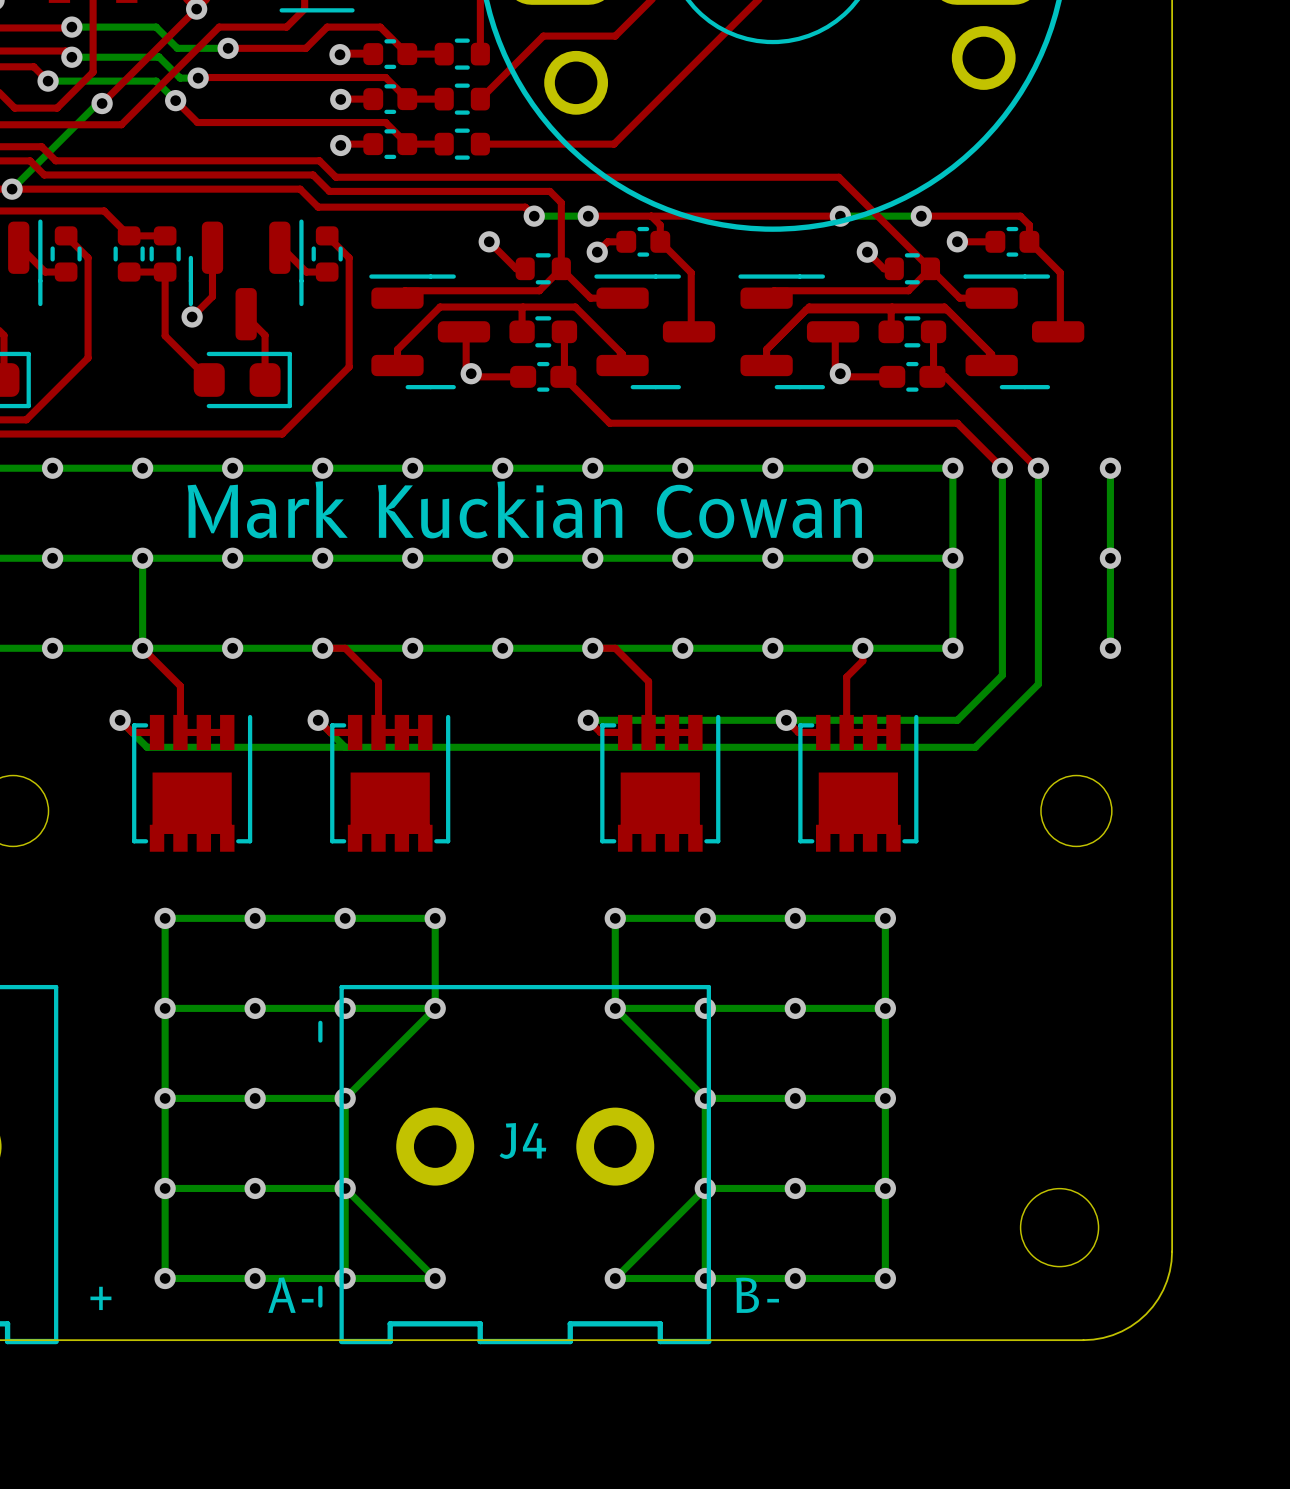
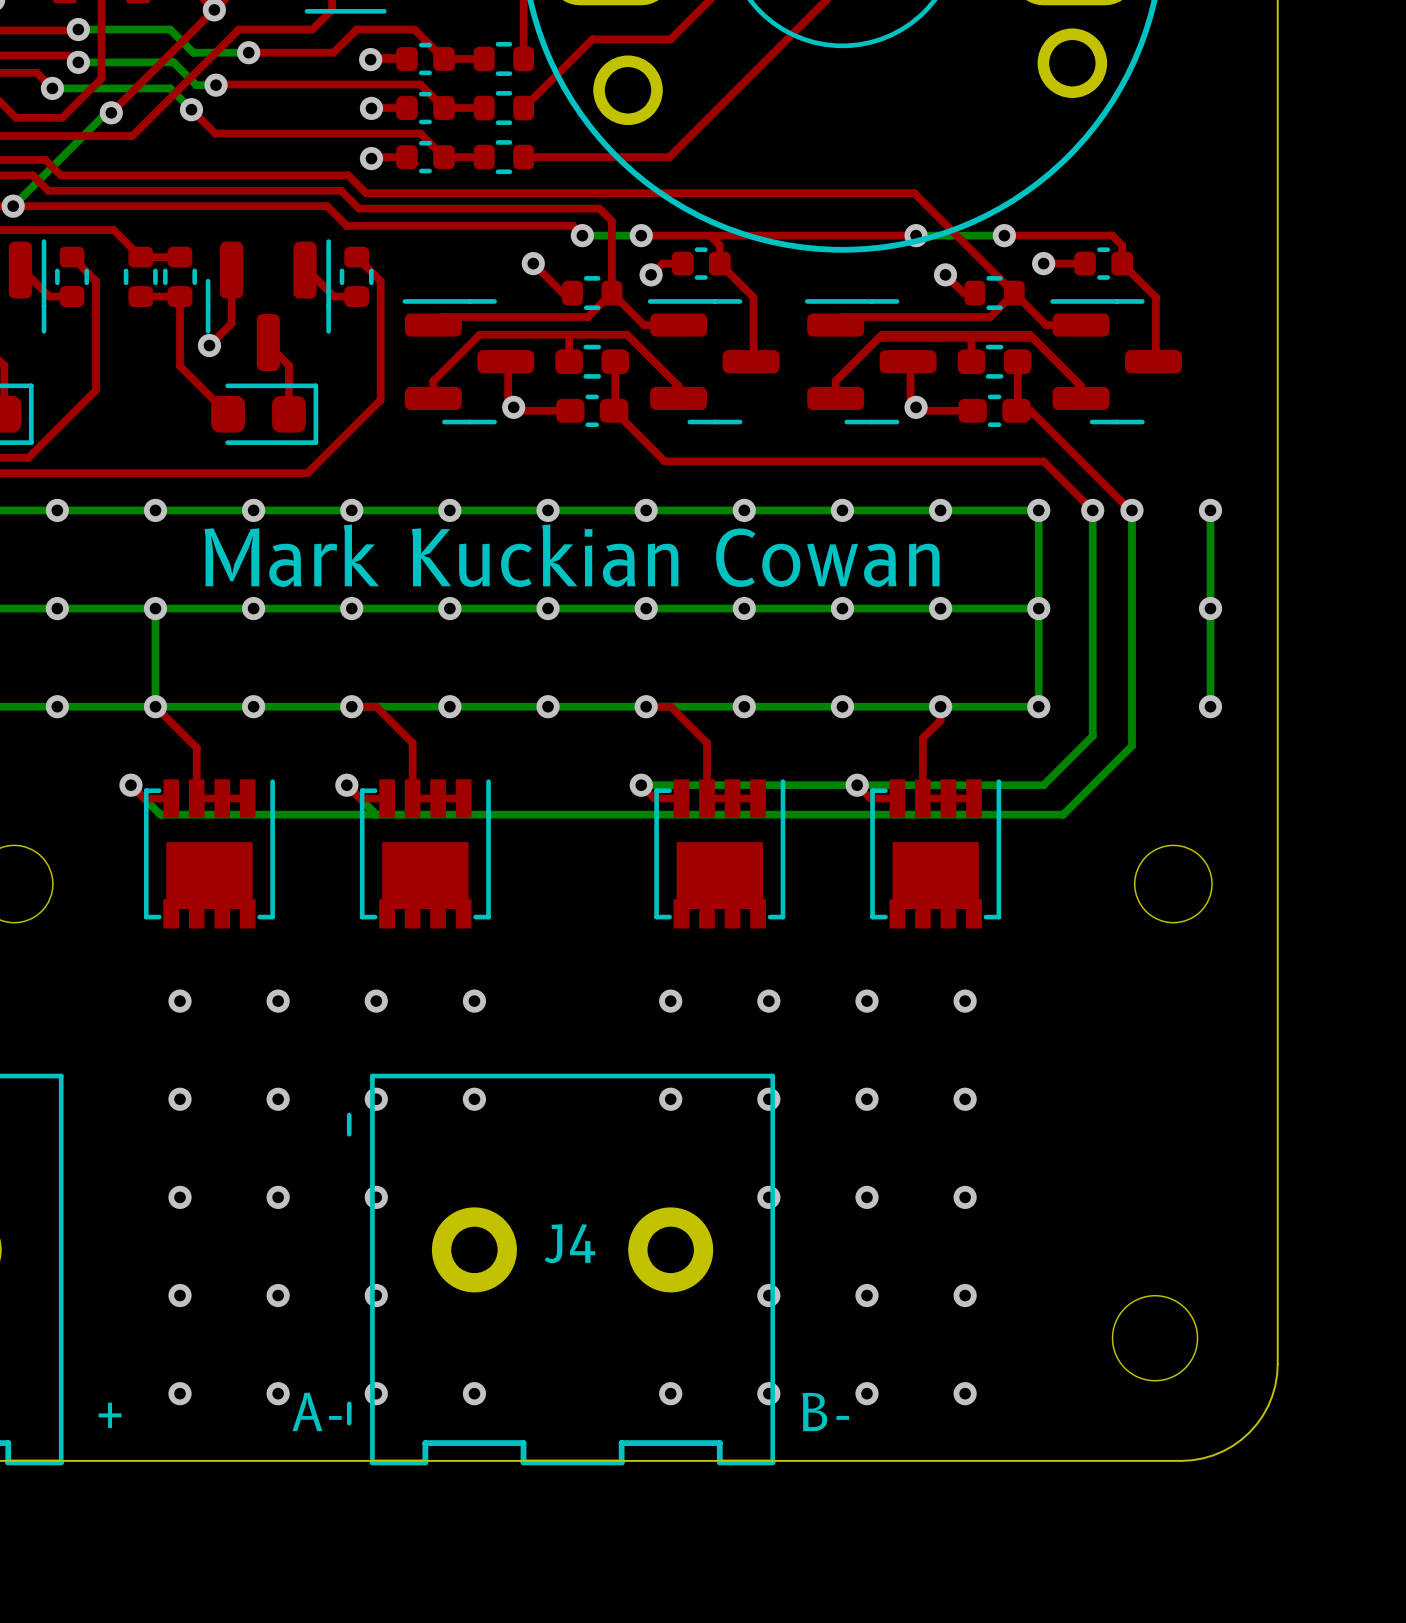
bottom track: (165, 1008) (435, 1008) -> none
bottom track: (435, 1008) (435, 918) (165, 918) (165, 1278) (435, 1278) (345, 1188) (165, 1188) -> none
bottom track: (435, 1008) (345, 1098) -> none
bottom track: (615, 1008) (885, 1008) -> none
bottom track: (615, 1008) (705, 1098) -> none
bottom track: (615, 1008) (615, 918) (885, 918) (885, 1278) (615, 1278) (705, 1188) (885, 1188) -> none
bottom track: (165, 1098) (345, 1098) -> none
bottom track: (345, 1098) (345, 1278) -> none
bottom track: (705, 1098) (705, 1278) -> none
bottom track: (705, 1098) (885, 1098) -> none

